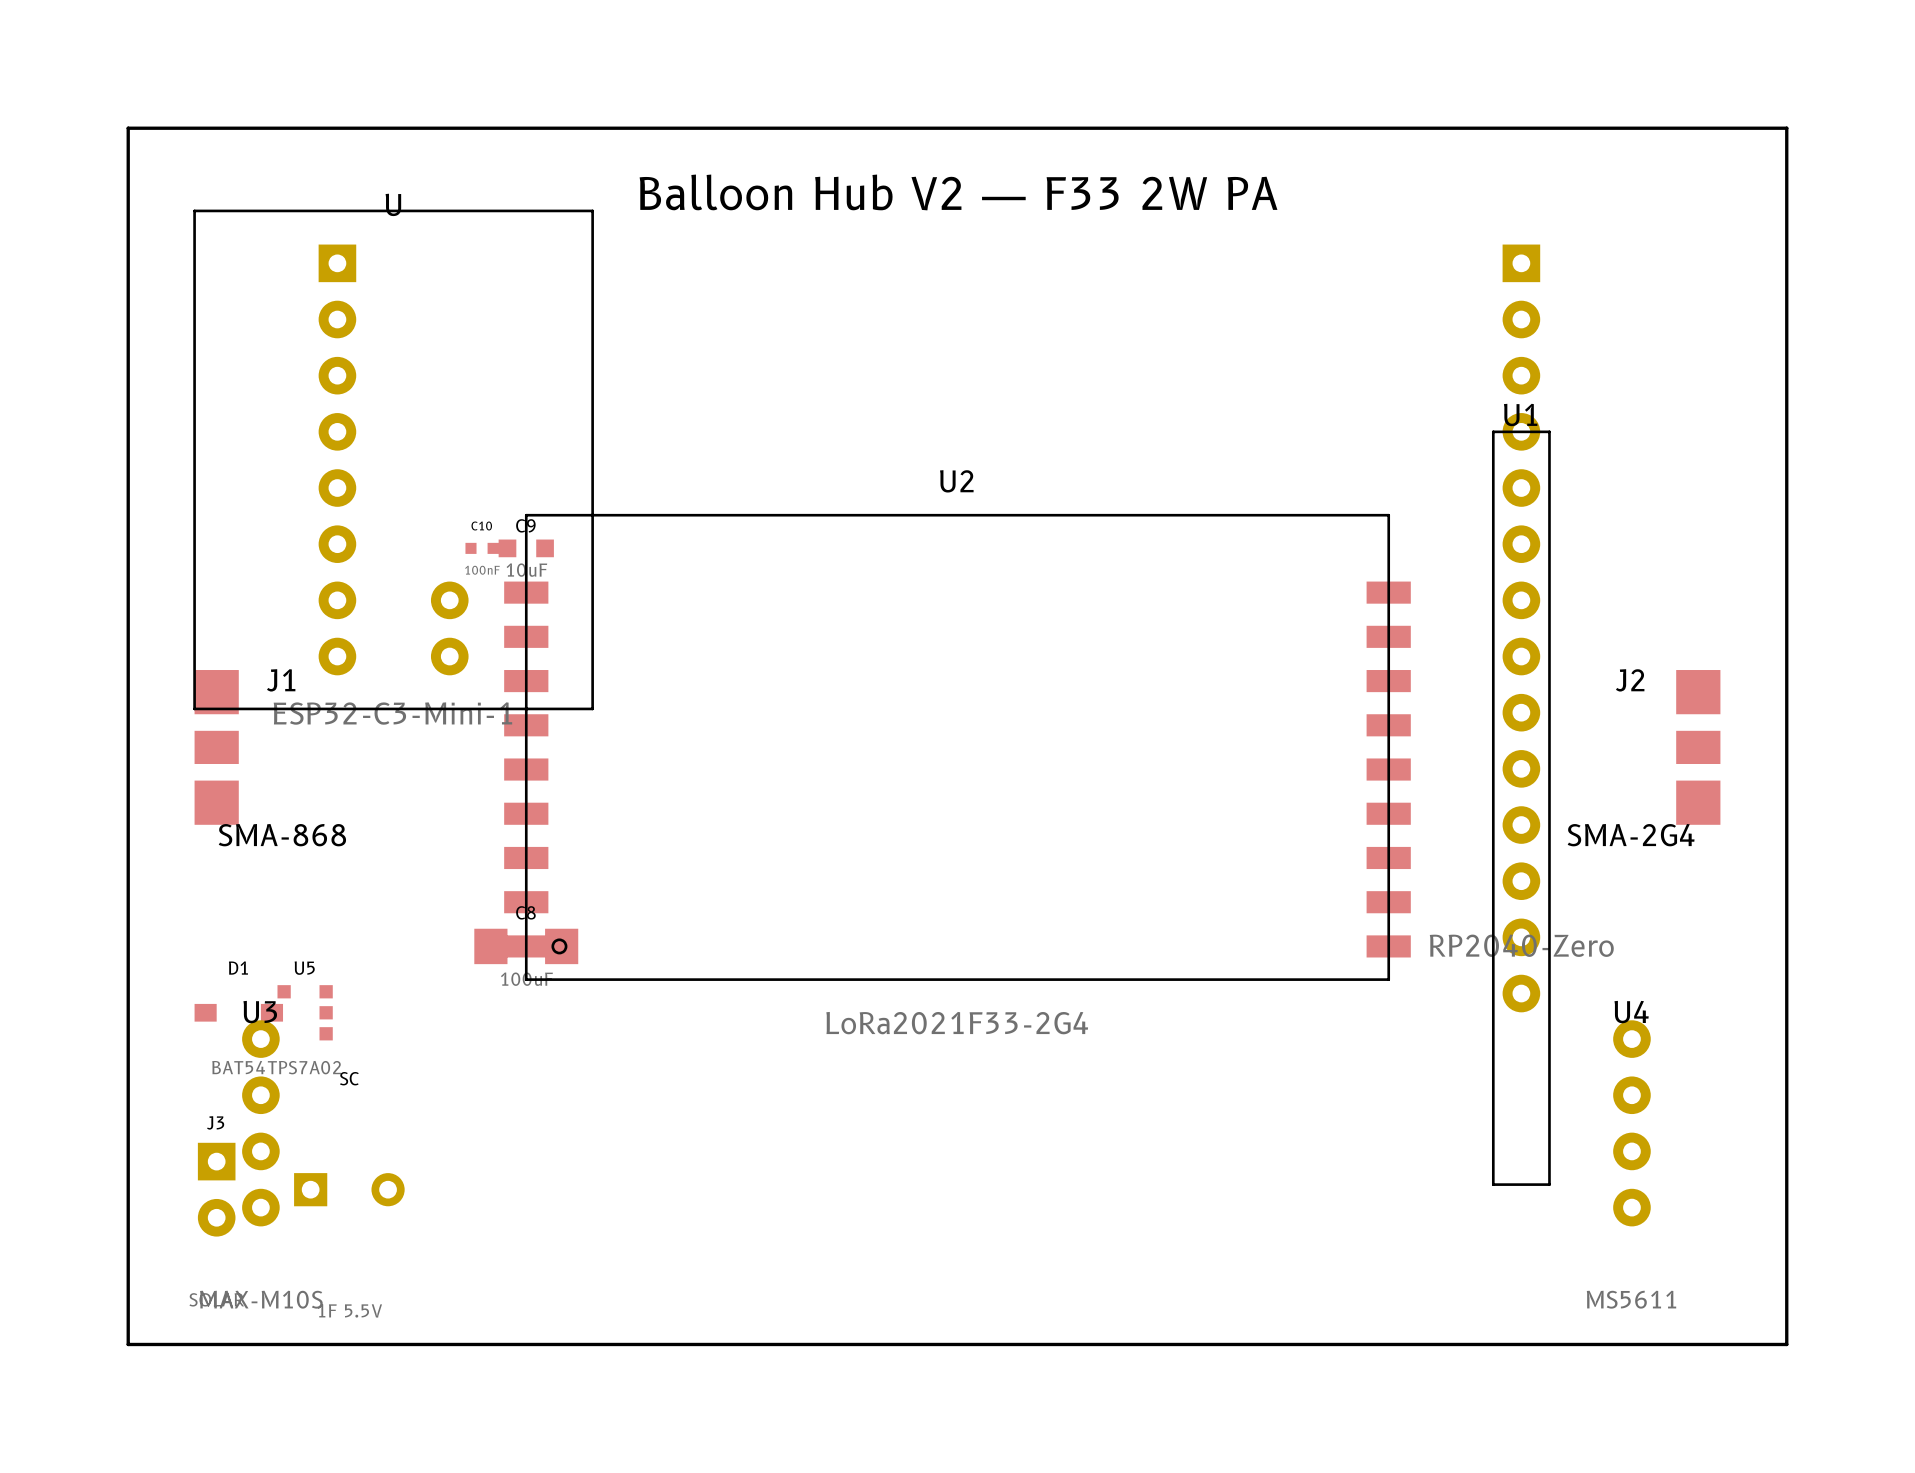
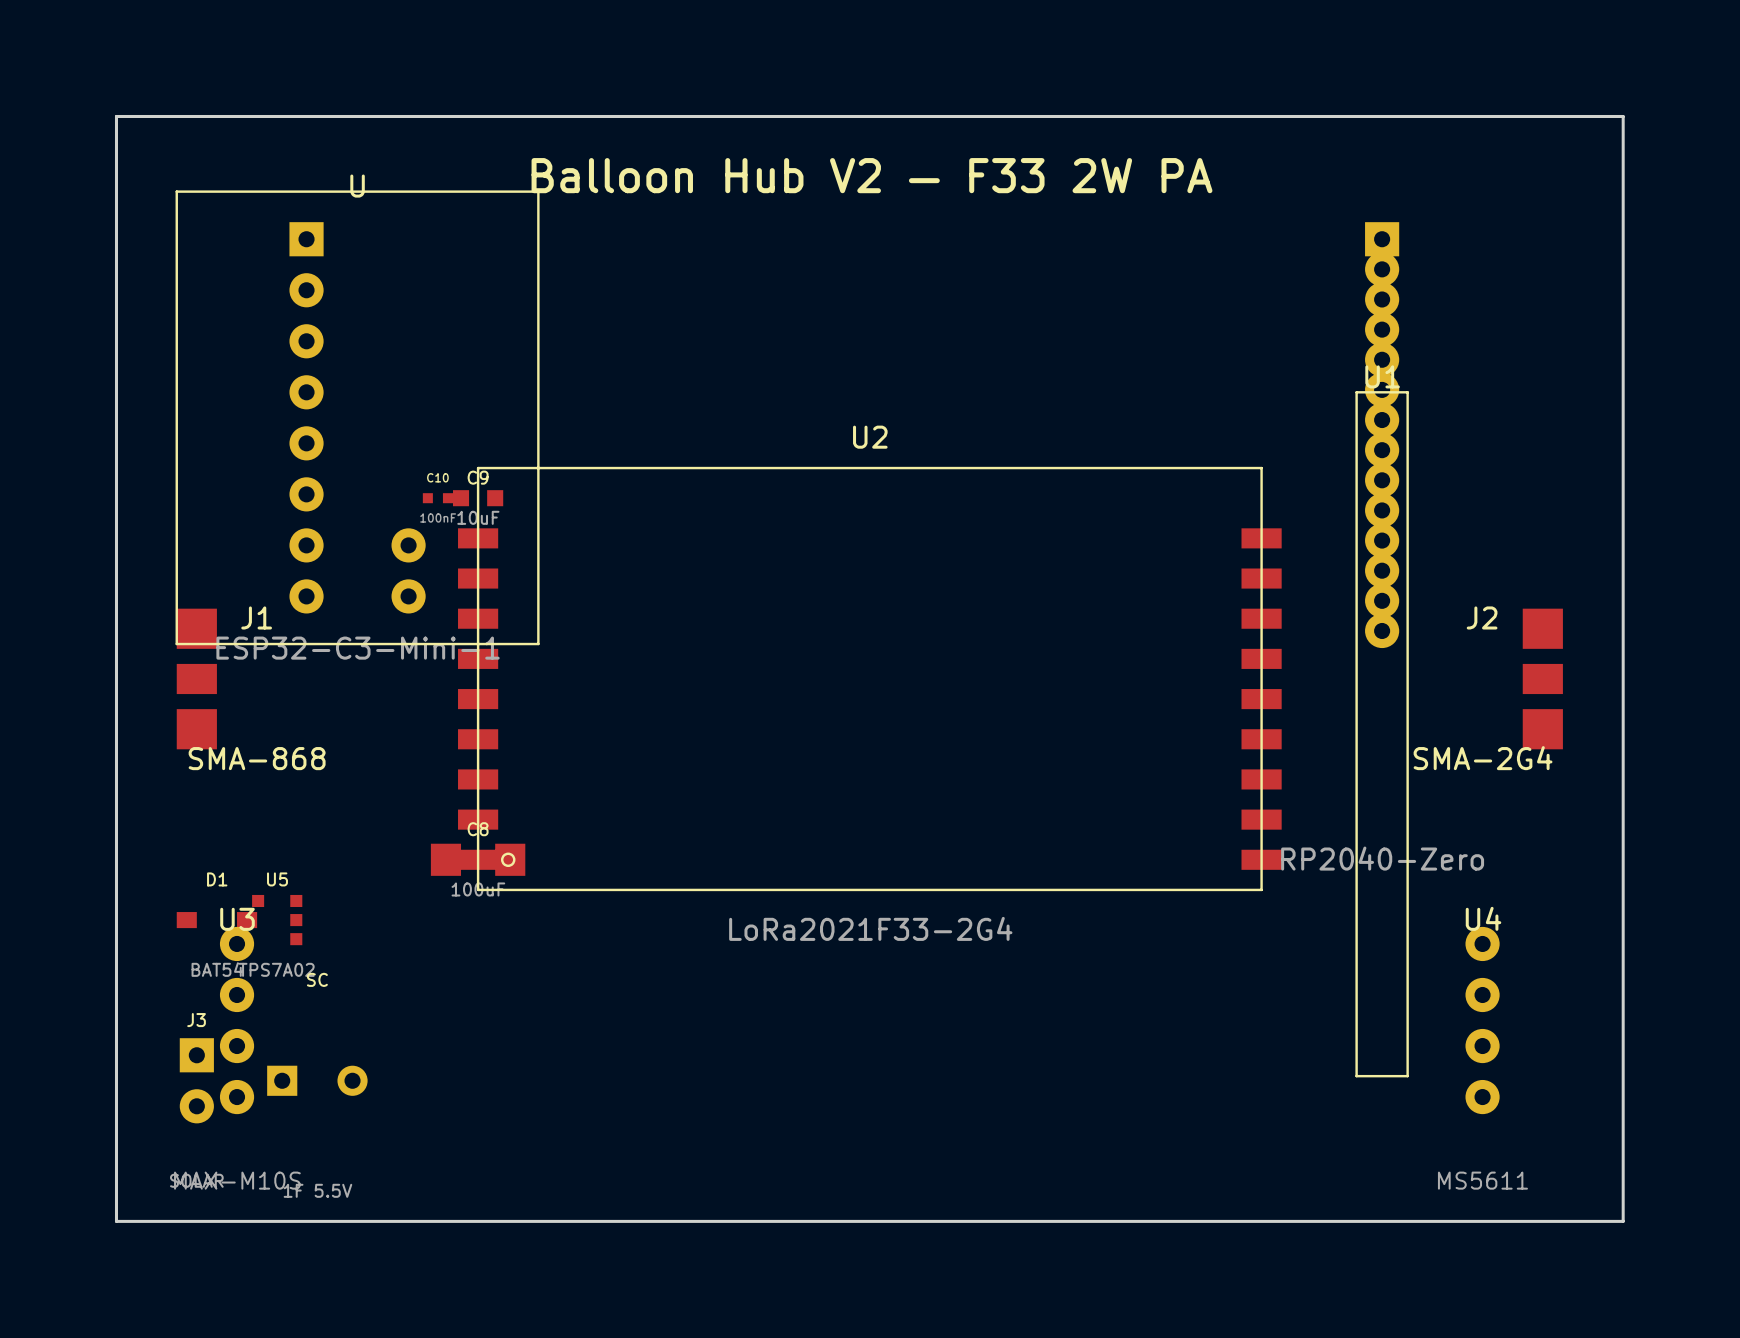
U1 footprint: [1491, 244, 1551, 1186] -> [1355, 222, 1409, 1078]

